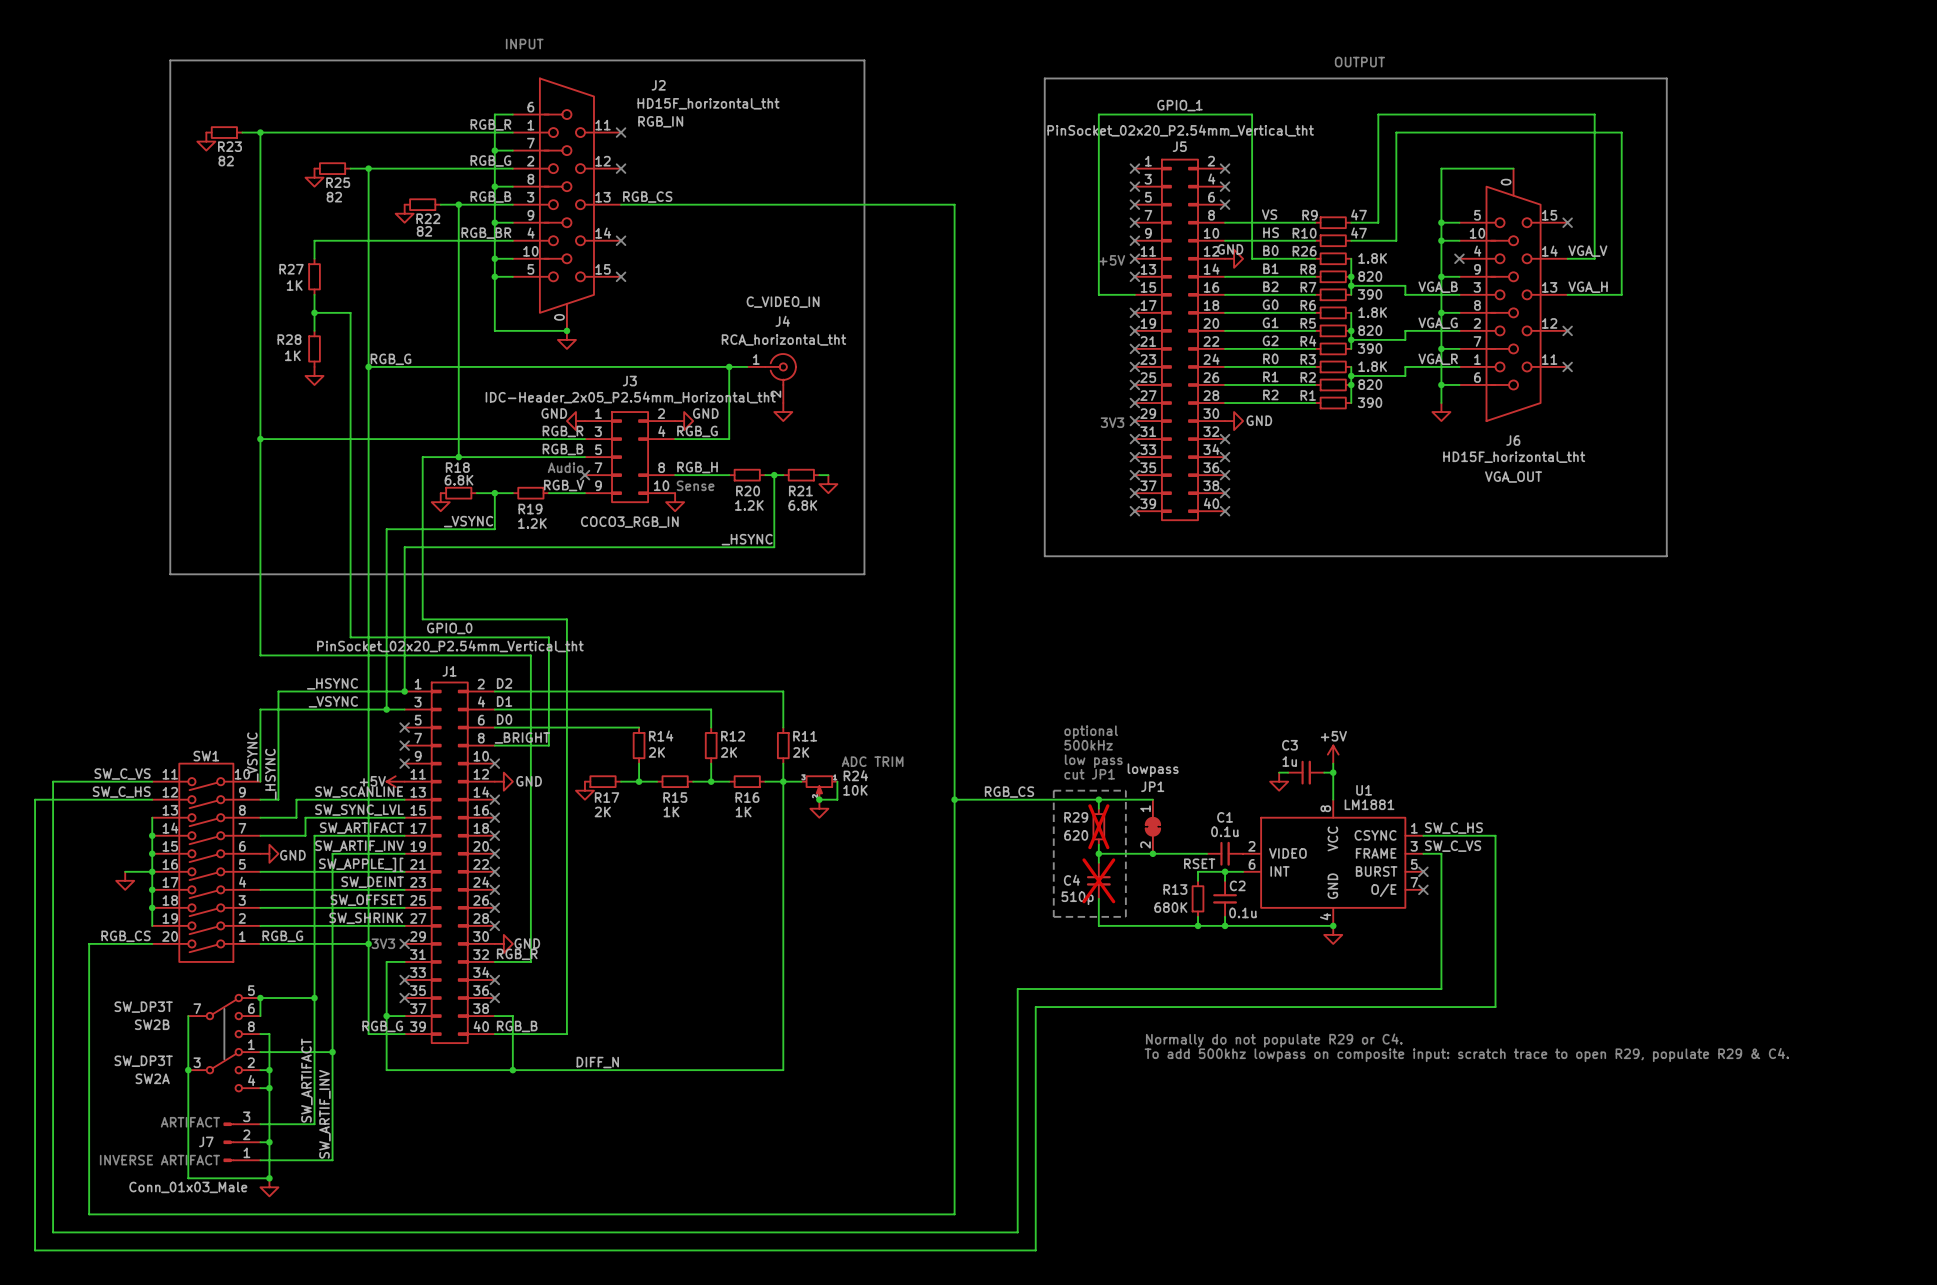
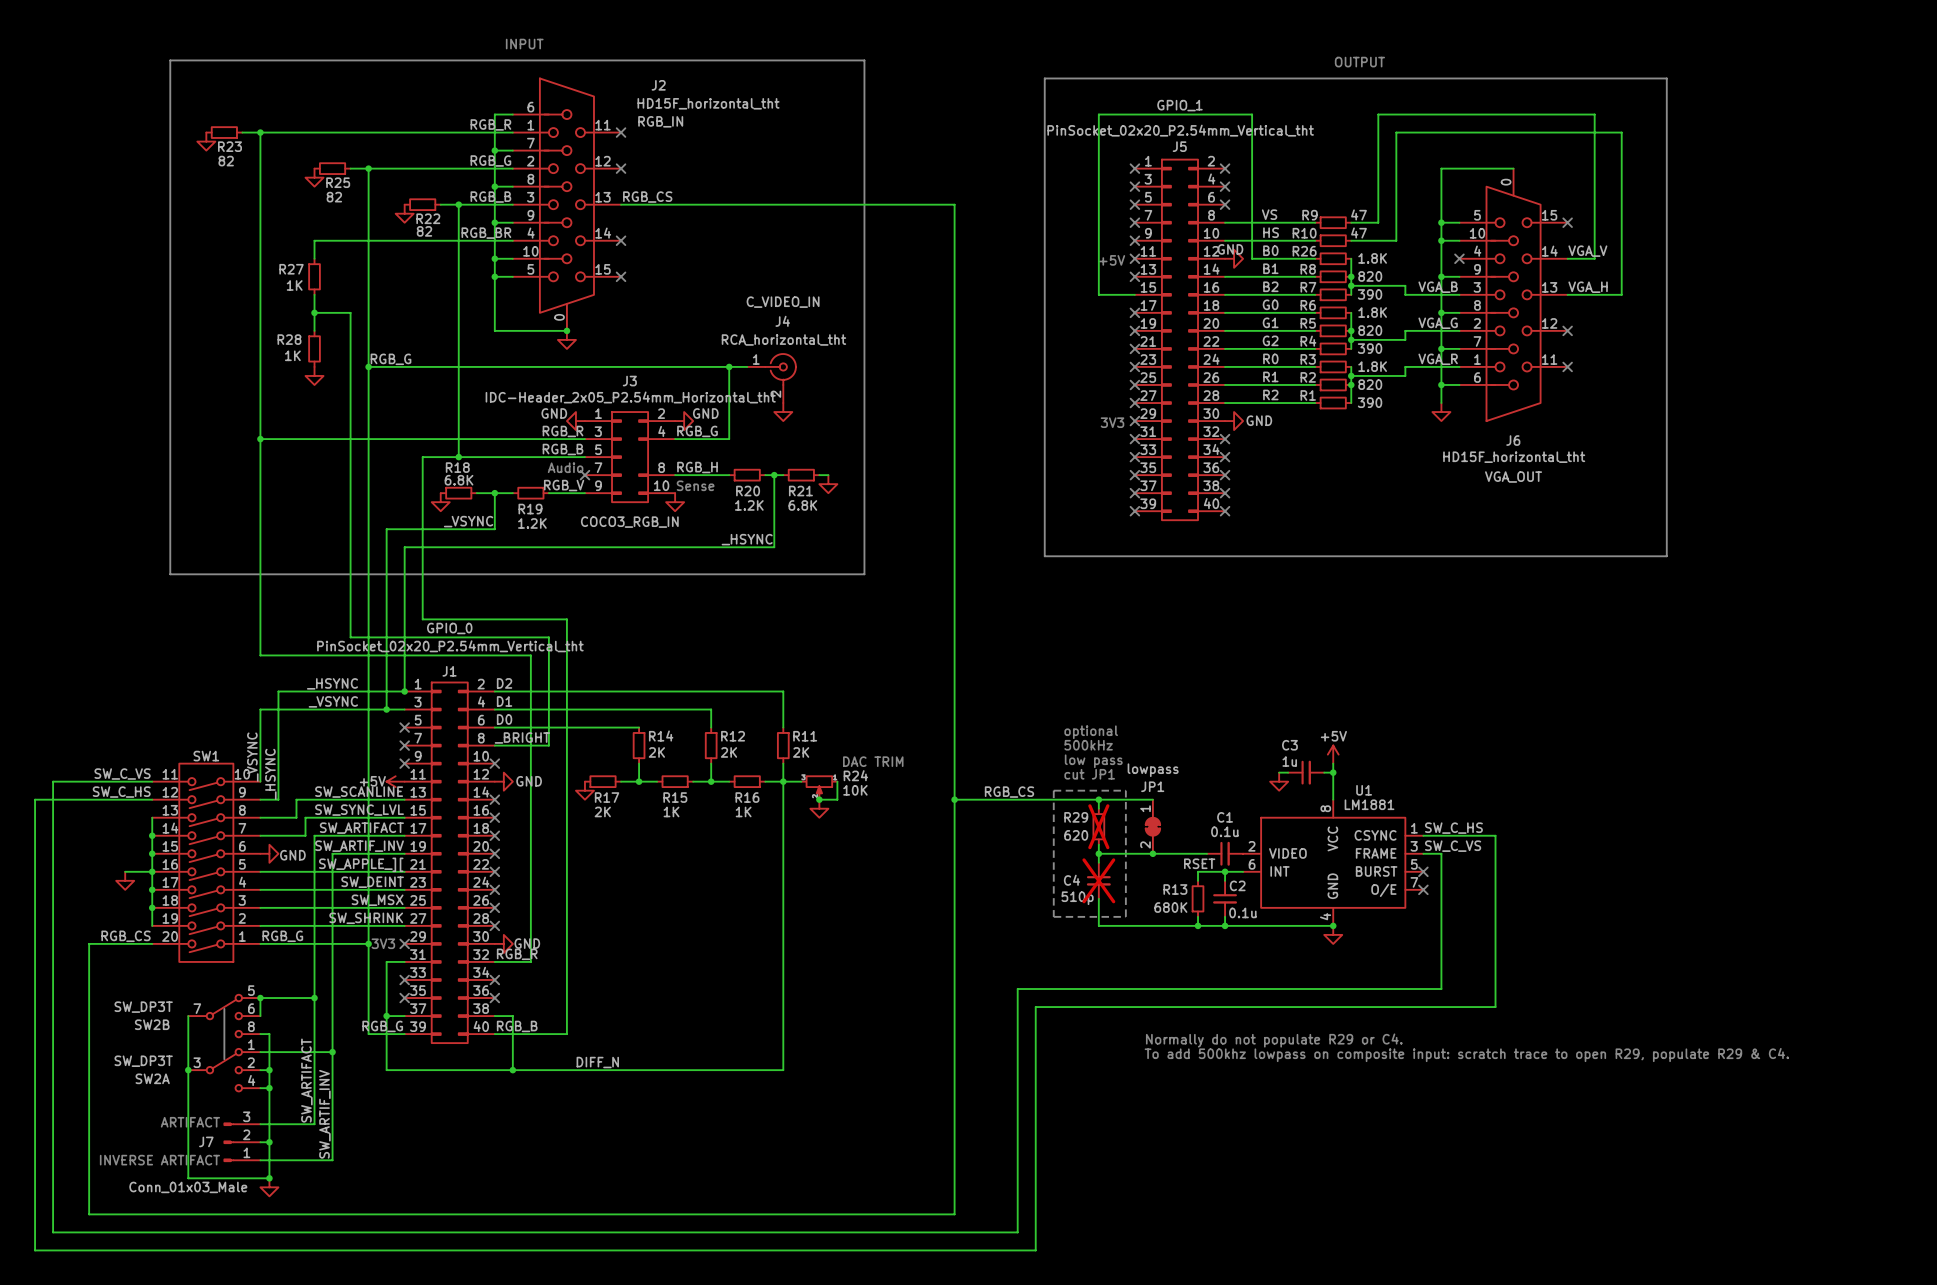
text: ADC TRIM (872, 761) -> DAC TRIM (873, 761)
label: SW_OFFSET (367, 900) -> SW_MSX (377, 900)

